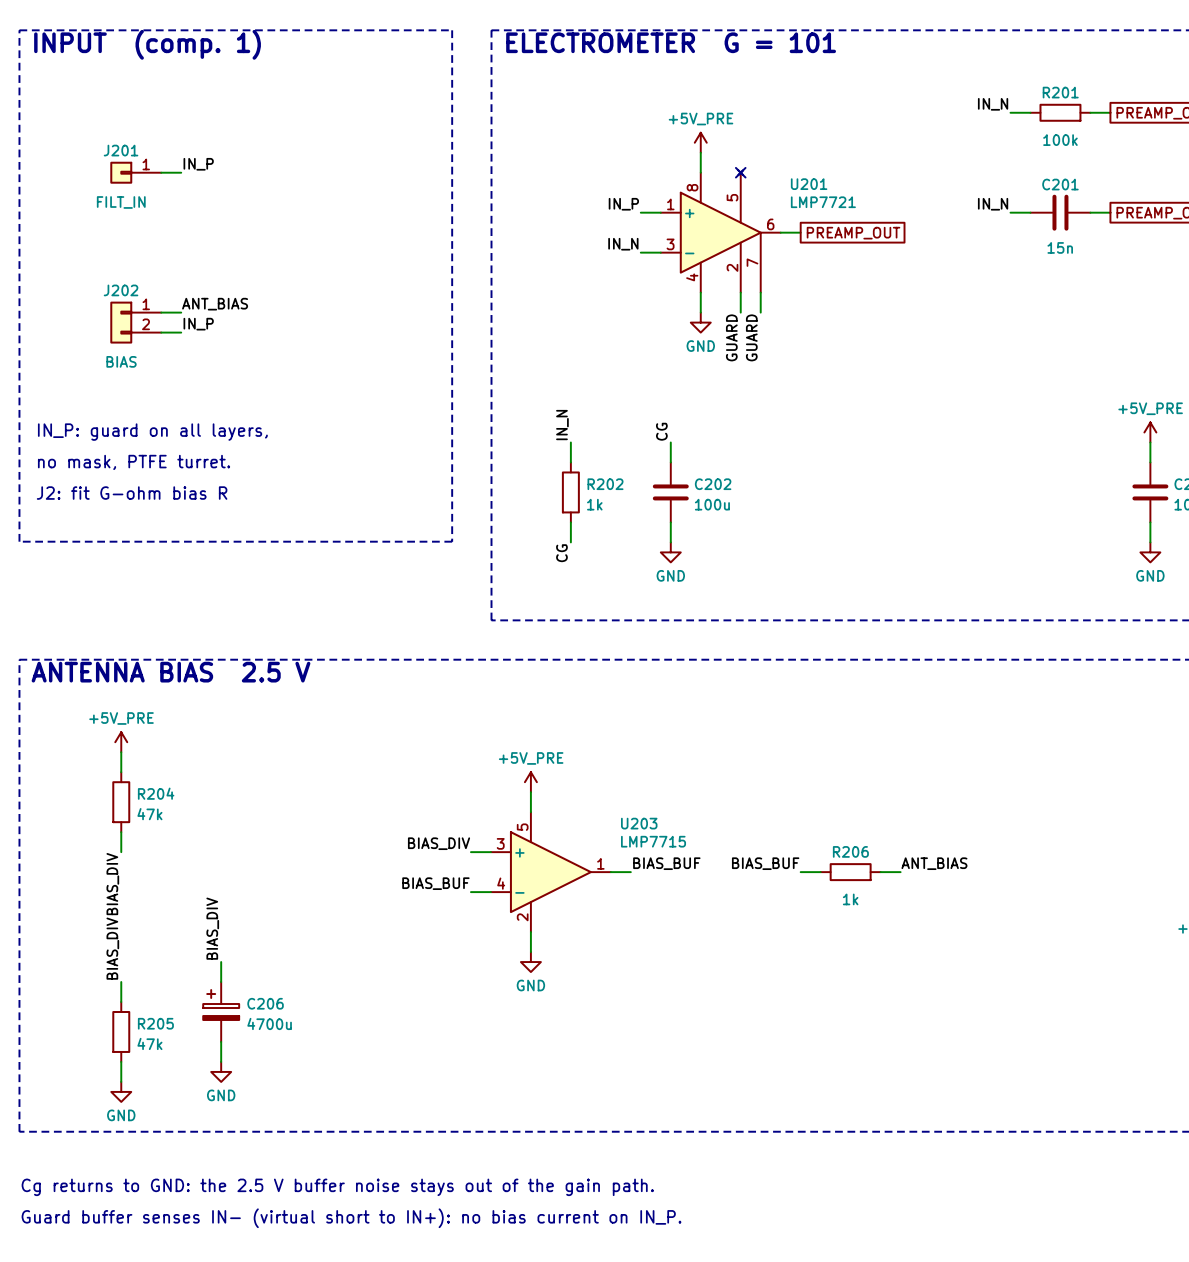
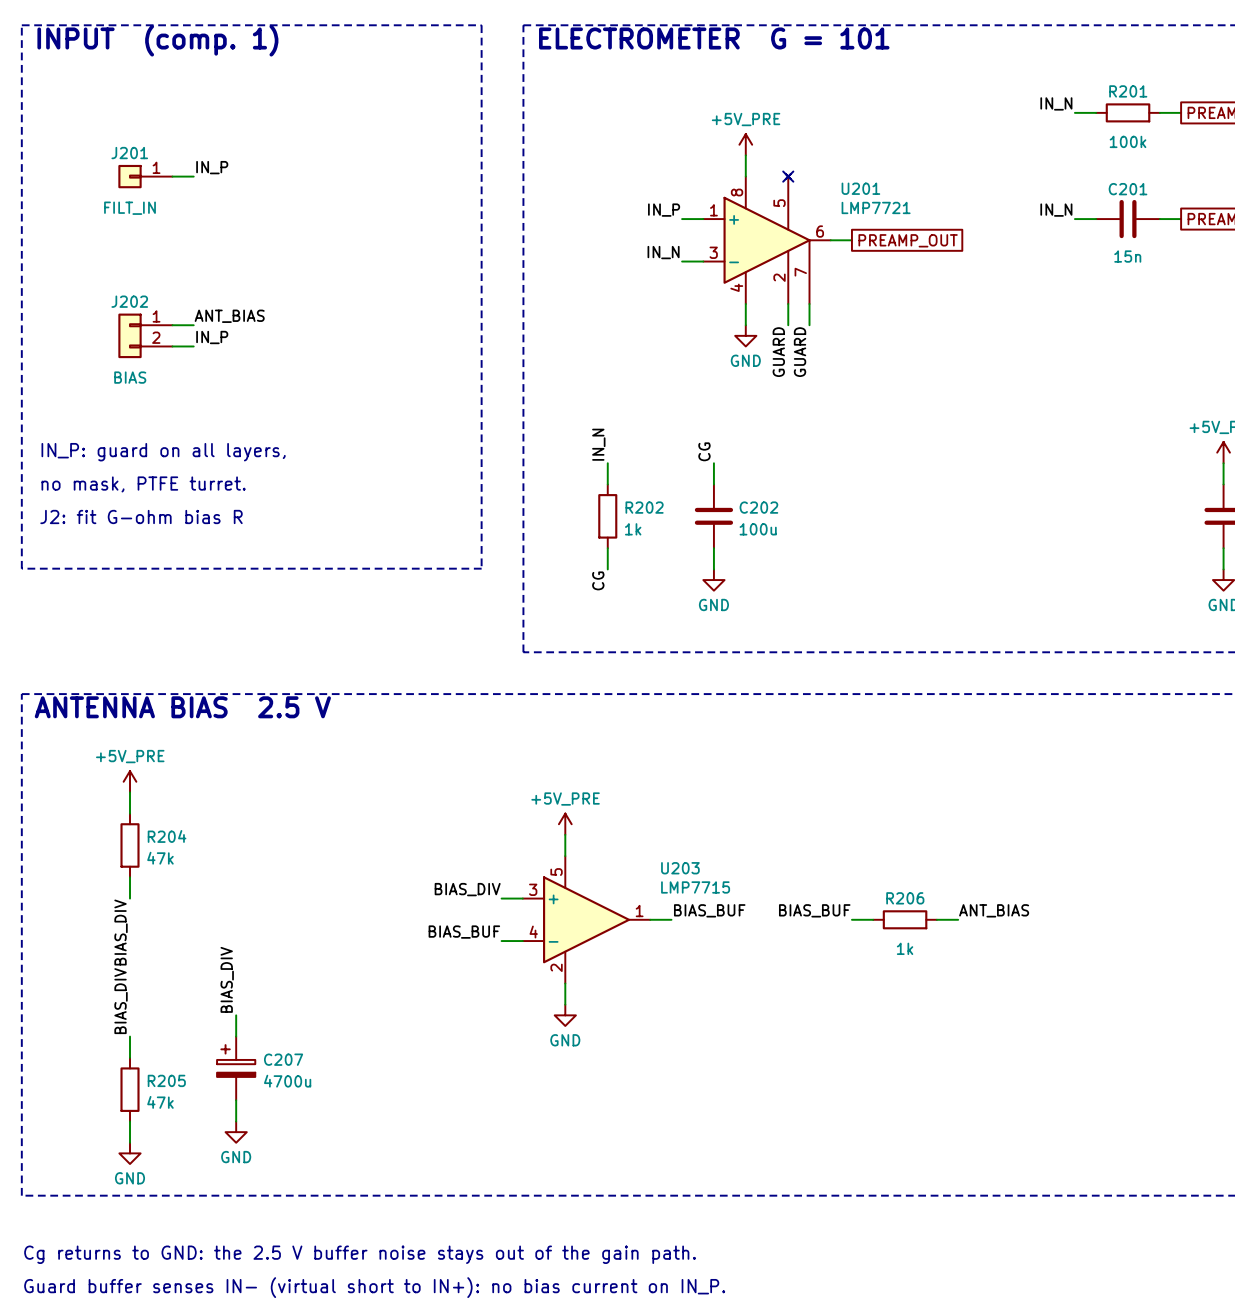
C206 name: C206 (265, 1003) -> C207 (283, 1059)

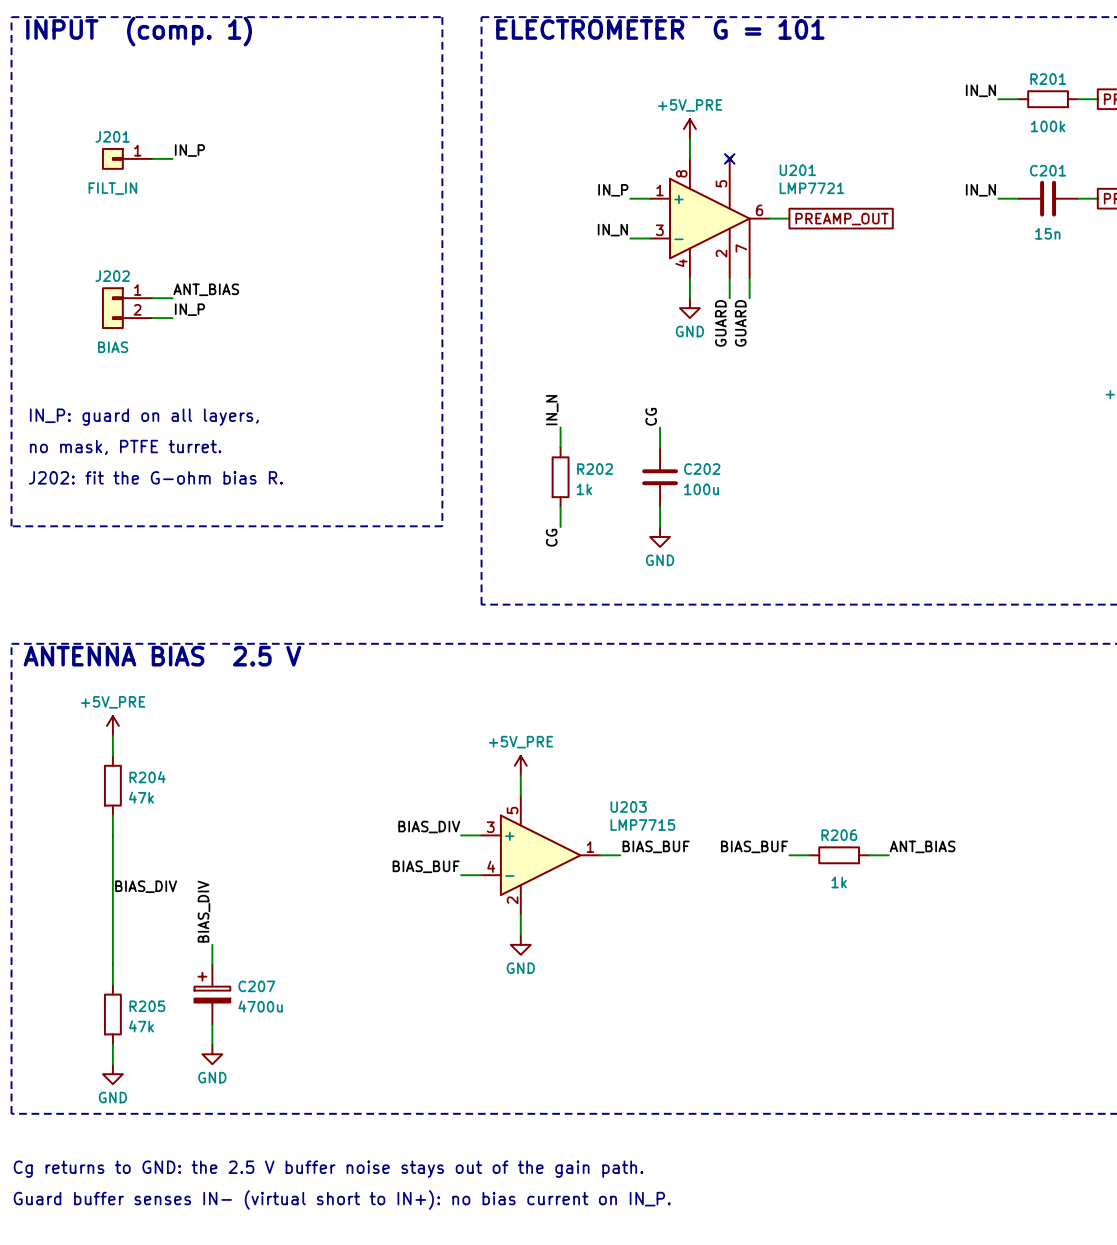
text: J2: fit G-ohm bias R (141, 516) -> J202: fit the G-ohm bias R. (155, 477)
wire: none -> (112, 835) (112, 964)
label: BIAS_DIV (121, 932) -> none
label: none -> BIAS_DIV (146, 886)
label: BIAS_DIV (121, 1001) -> none

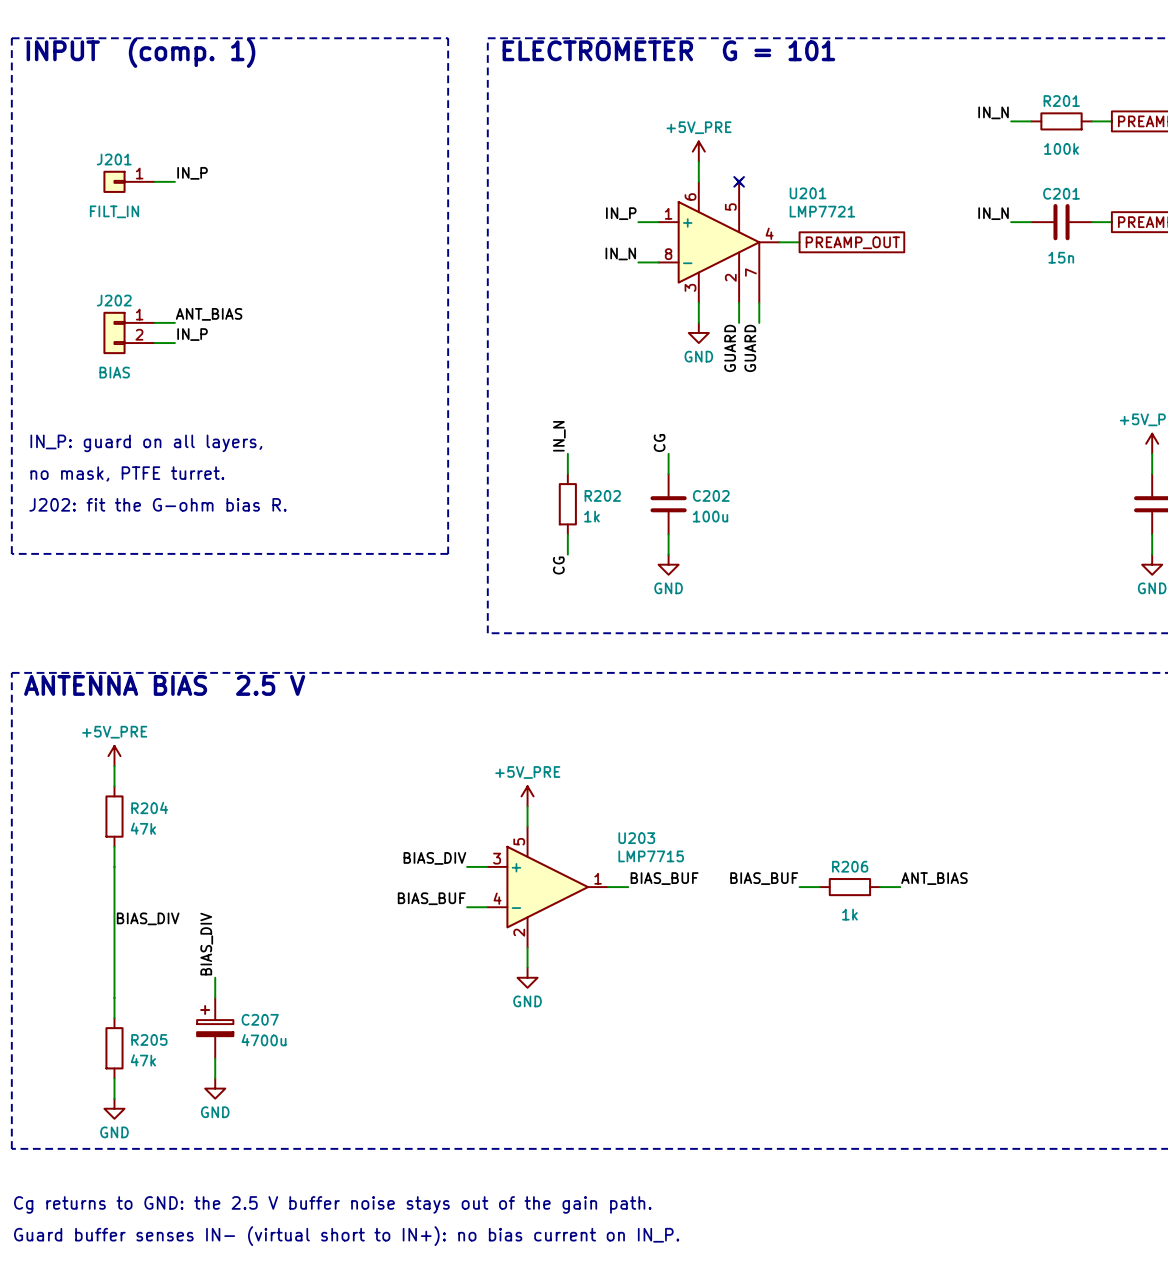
U201 pin number: 8 (681, 173) -> 6 (690, 196)
U201 pin number: 6 (759, 210) -> 4 (769, 233)
U201 pin number: 3 (659, 230) -> 8 (668, 254)
U201 pin number: 4 (681, 263) -> 3 (690, 287)

